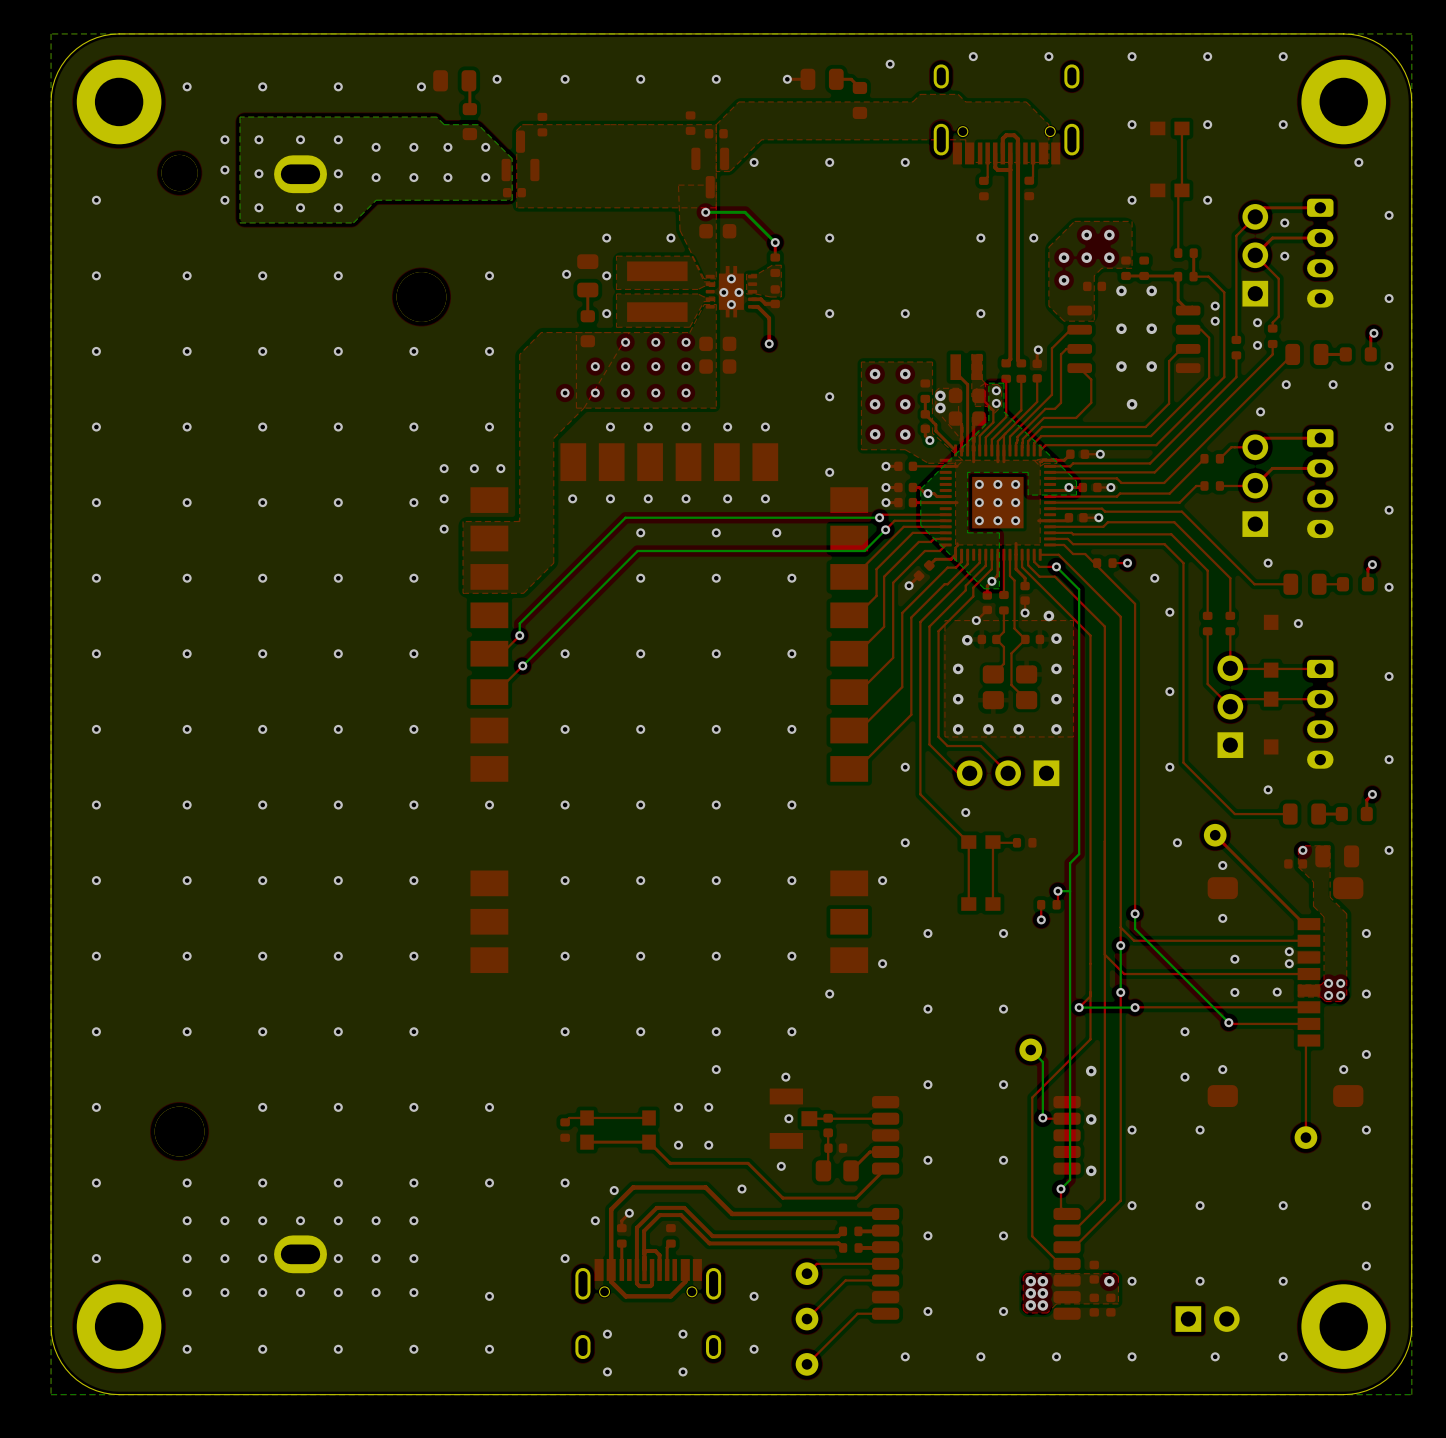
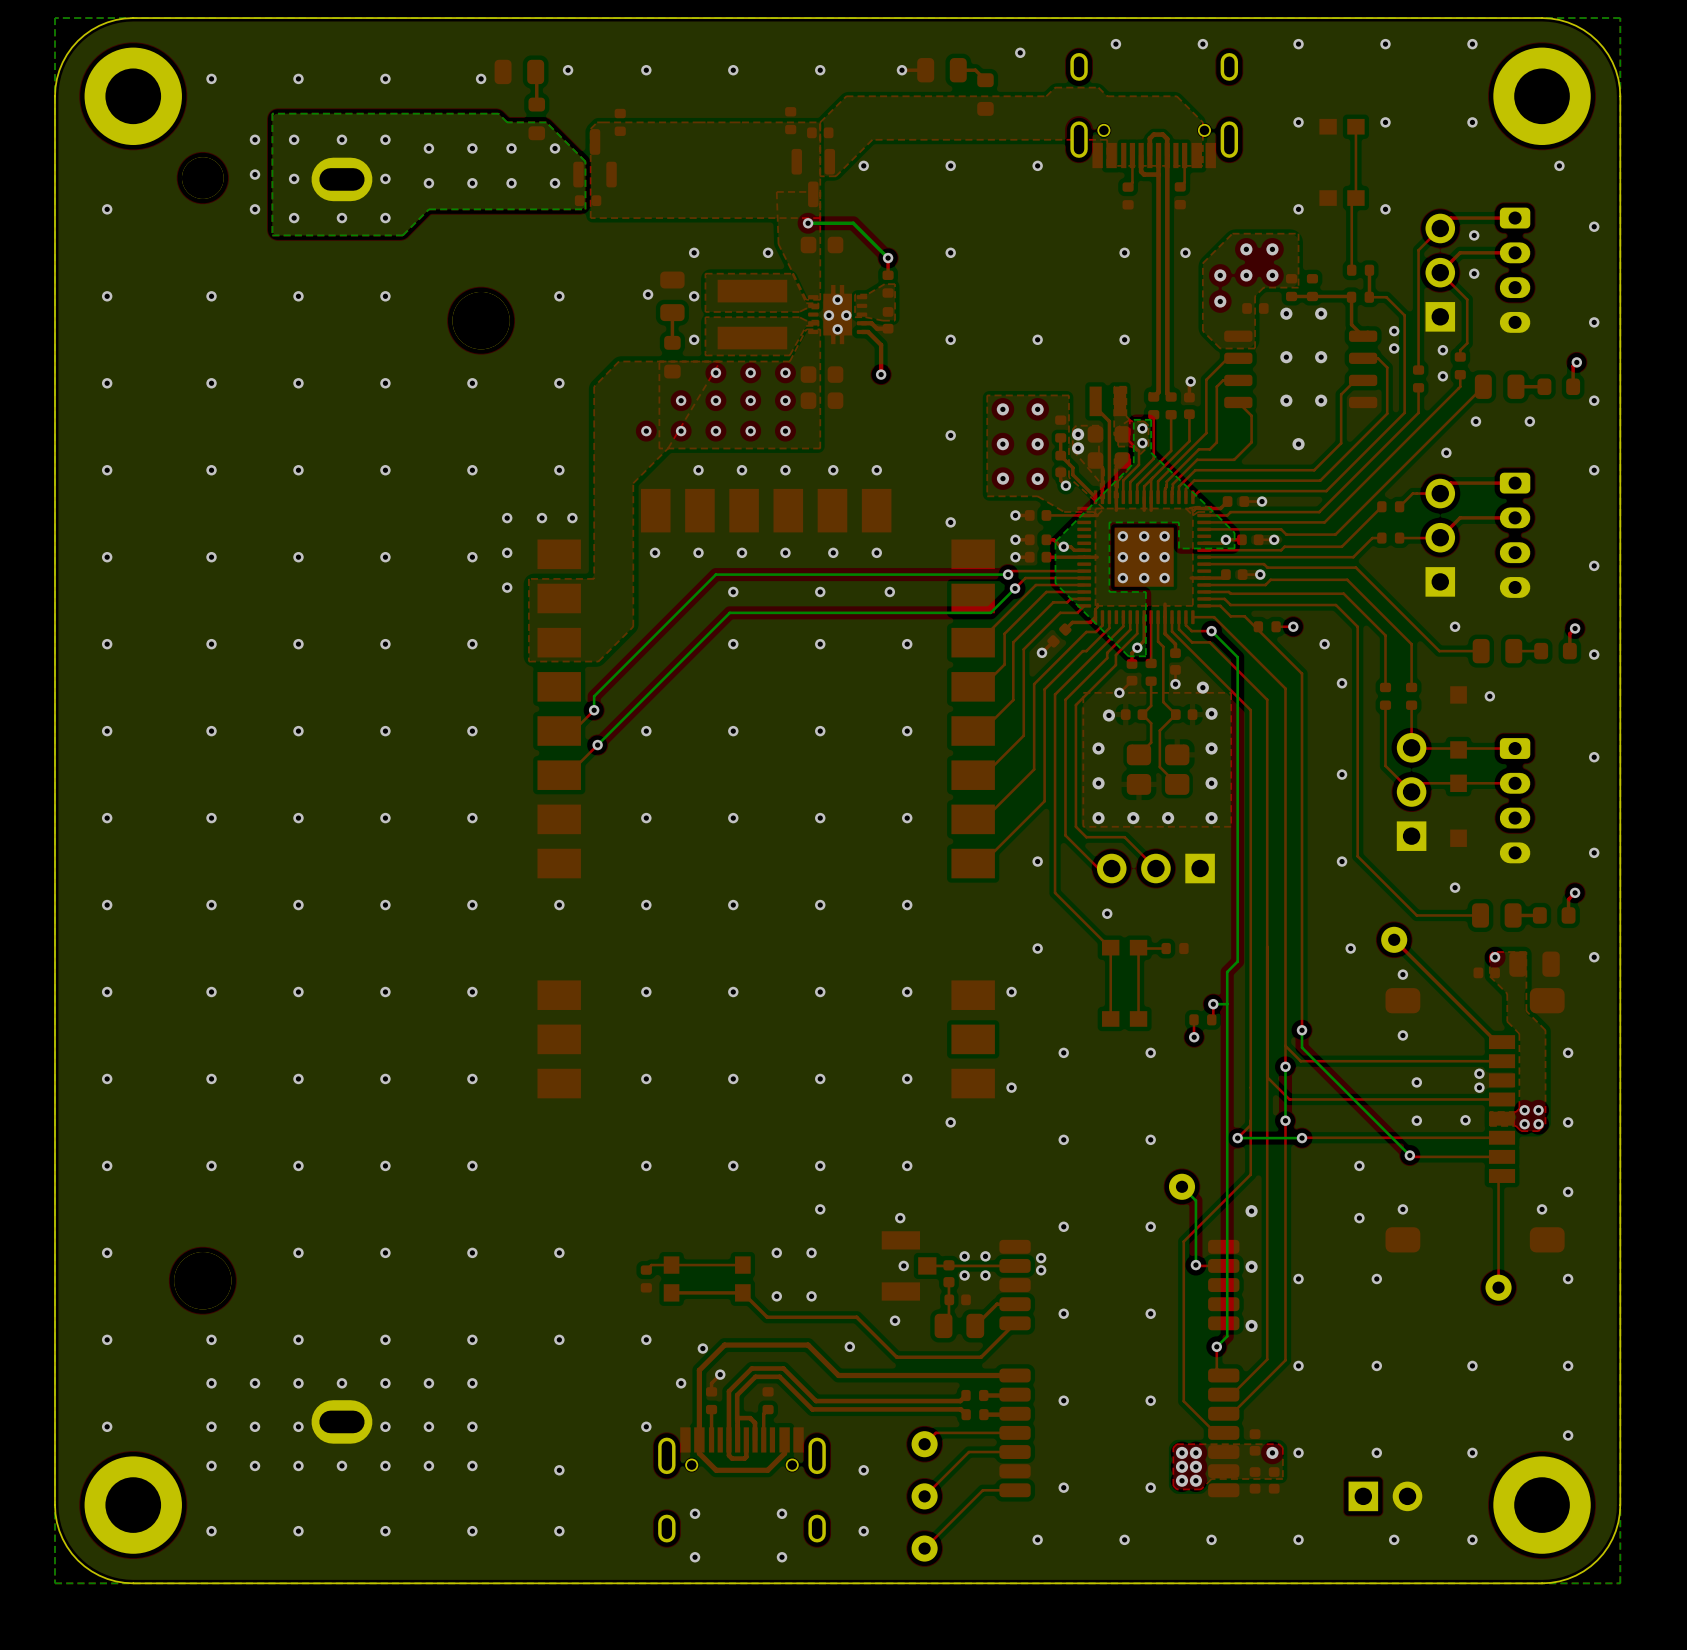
via: none -> (964, 1256)
via: none -> (985, 1256)
via: none -> (1041, 1258)
via: none -> (1041, 1270)
via: none -> (964, 1275)
via: none -> (985, 1275)

